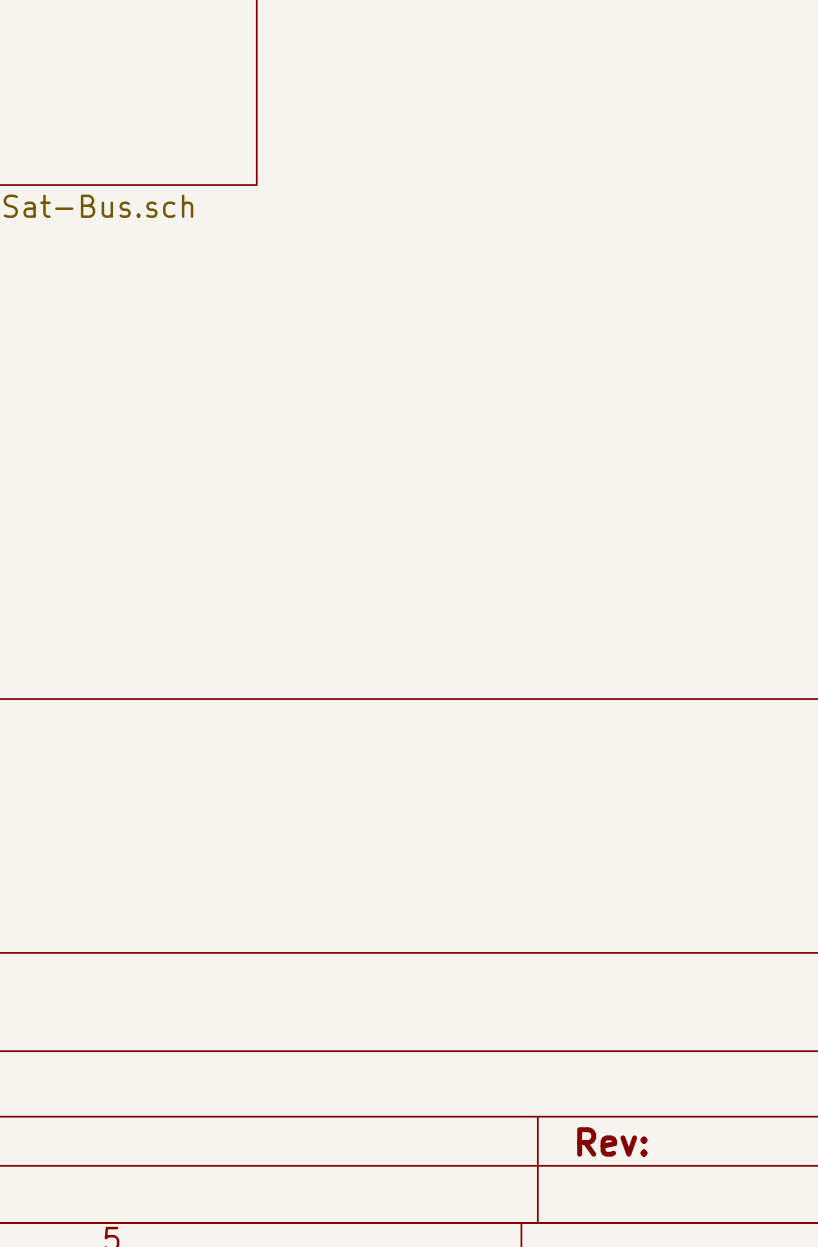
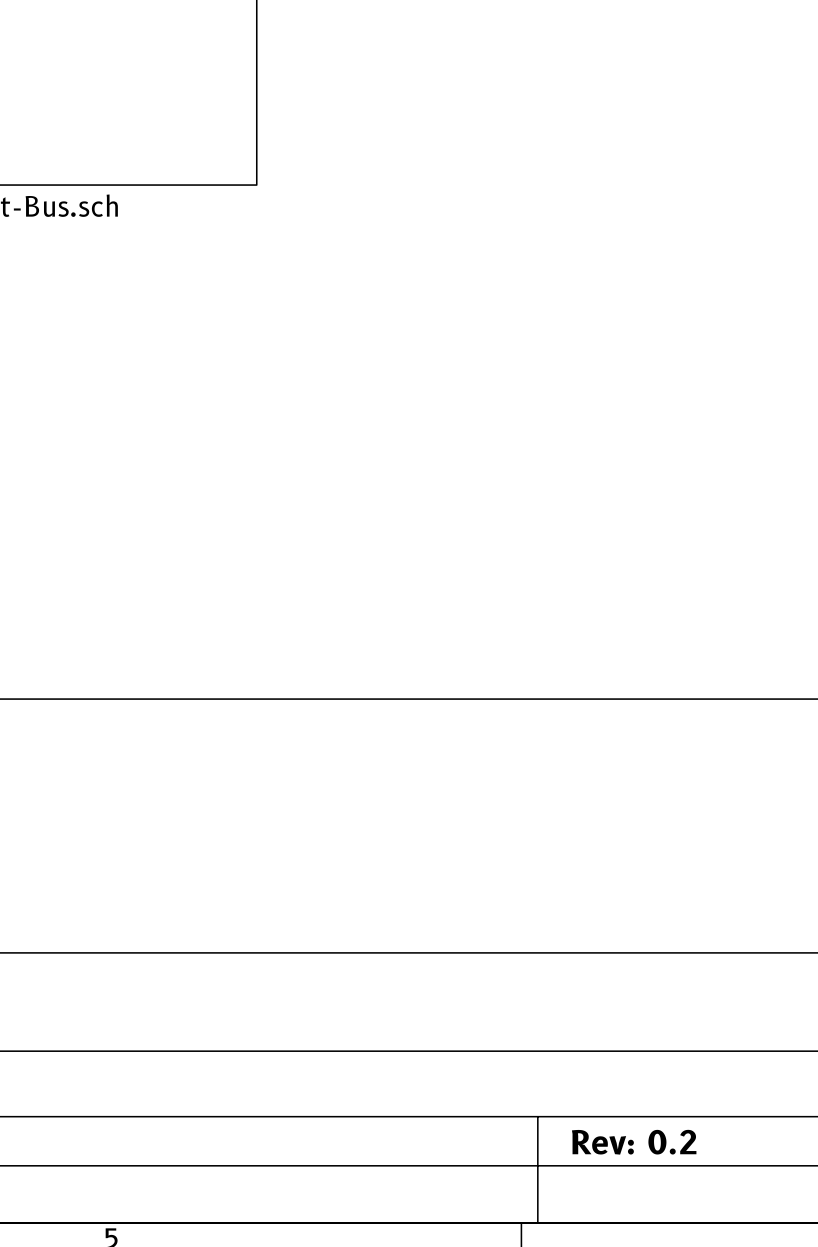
title block: Rev: (612, 1141) -> Rev: 0.2 (634, 1142)

